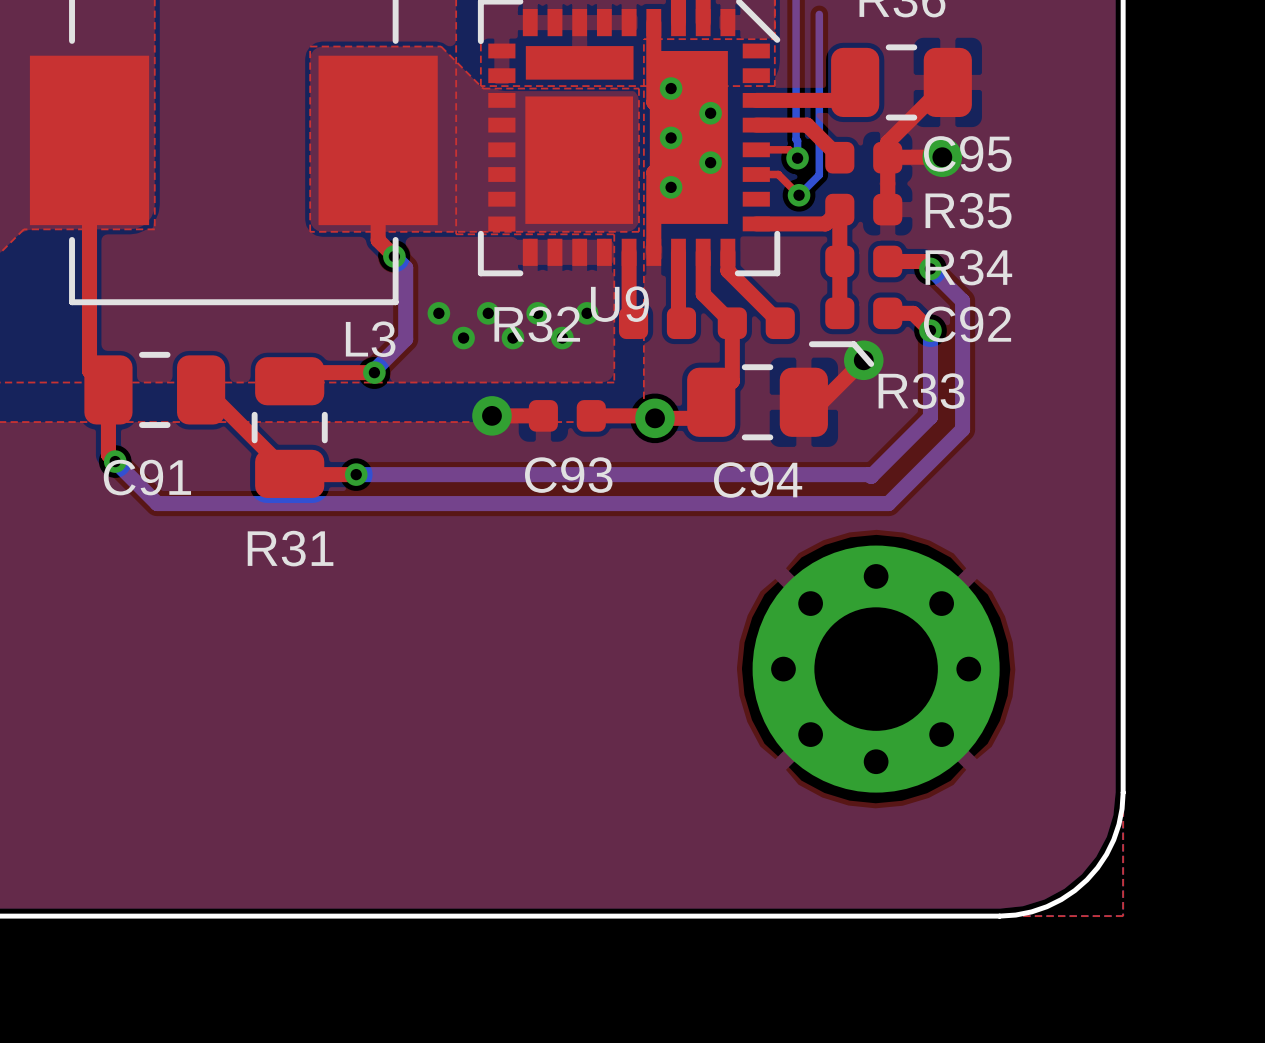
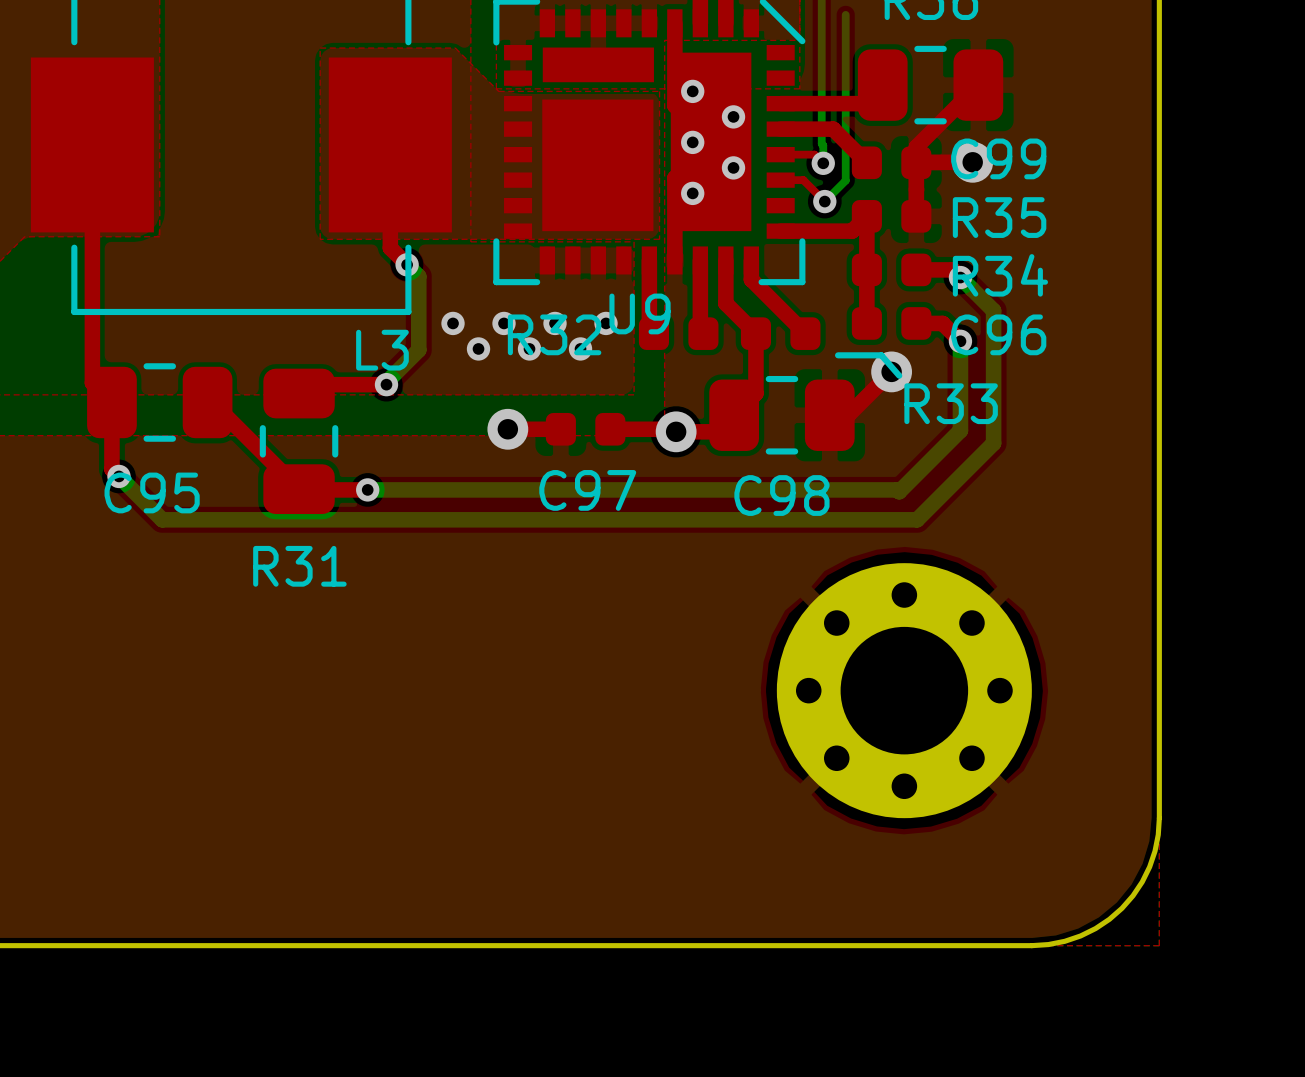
C95 name: C95 (967, 153) -> C99 (998, 158)
C92 name: C92 (967, 324) -> C96 (998, 334)
C93 name: C93 (568, 475) -> C97 (587, 490)
C91 name: C91 (147, 477) -> C95 (152, 492)
C94 name: C94 (758, 480) -> C98 (781, 495)

